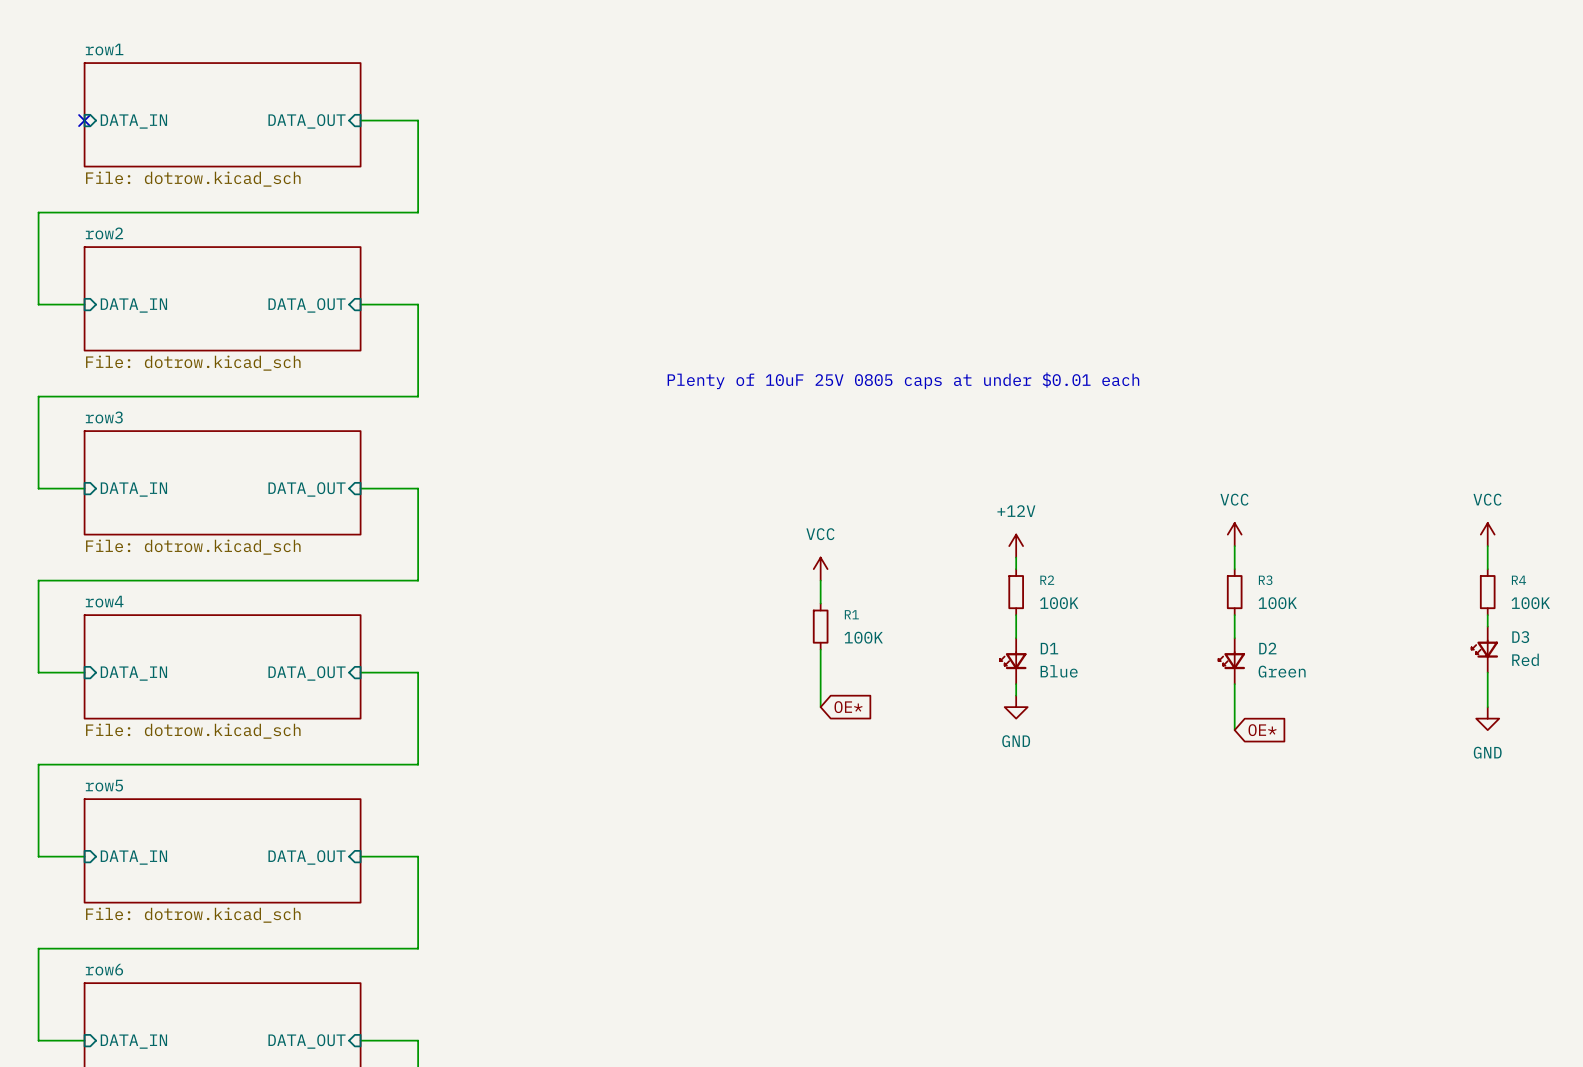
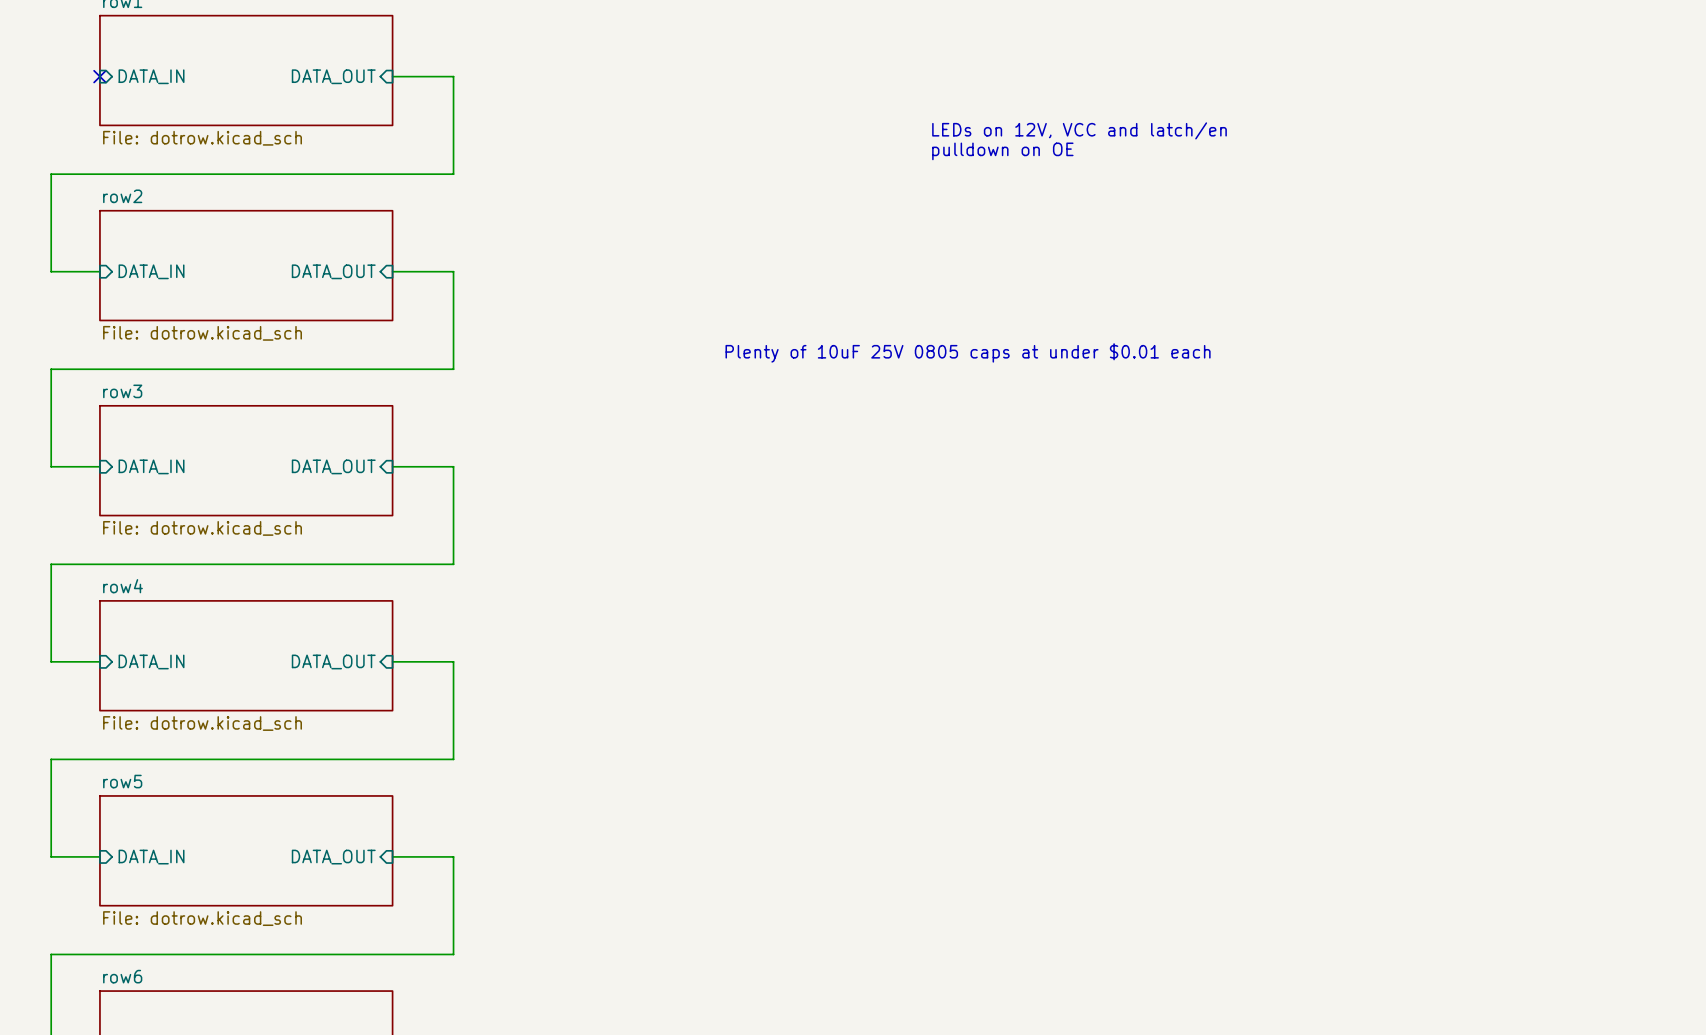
text: none -> LEDs on 12V, VCC and latch/en (1079, 130)
text: none -> pulldown on OE (1002, 151)
power symbol: VCC (1234, 534) -> none
power symbol: VCC (1487, 534) -> none
power symbol: +12V (1016, 546) -> none
wire: (1234, 546) (1234, 569) -> none
wire: (1487, 546) (1487, 569) -> none
wire: (1016, 557) (1016, 569) -> none
power symbol: VCC (820, 569) -> none
wire: (820, 580) (820, 603) -> none
R2: 100K (1016, 592) -> none
R3: 100K (1234, 592) -> none
R4: 100K (1487, 592) -> none
wire: (1016, 615) (1016, 638) -> none
wire: (1234, 615) (1234, 638) -> none
wire: (1487, 615) (1487, 626) -> none
R1: 100K (820, 626) -> none
wire: (820, 649) (820, 707) -> none
D3: Red (1484, 649) -> none
D1: Blue (1013, 661) -> none
D2: Green (1231, 661) -> none
wire: (1487, 672) (1487, 707) -> none
wire: (1016, 684) (1016, 695) -> none
wire: (1234, 684) (1234, 730) -> none
global label: OE* (848, 707) -> none
power symbol: GND (1016, 707) -> none
power symbol: GND (1487, 718) -> none
global label: OE* (1262, 730) -> none

